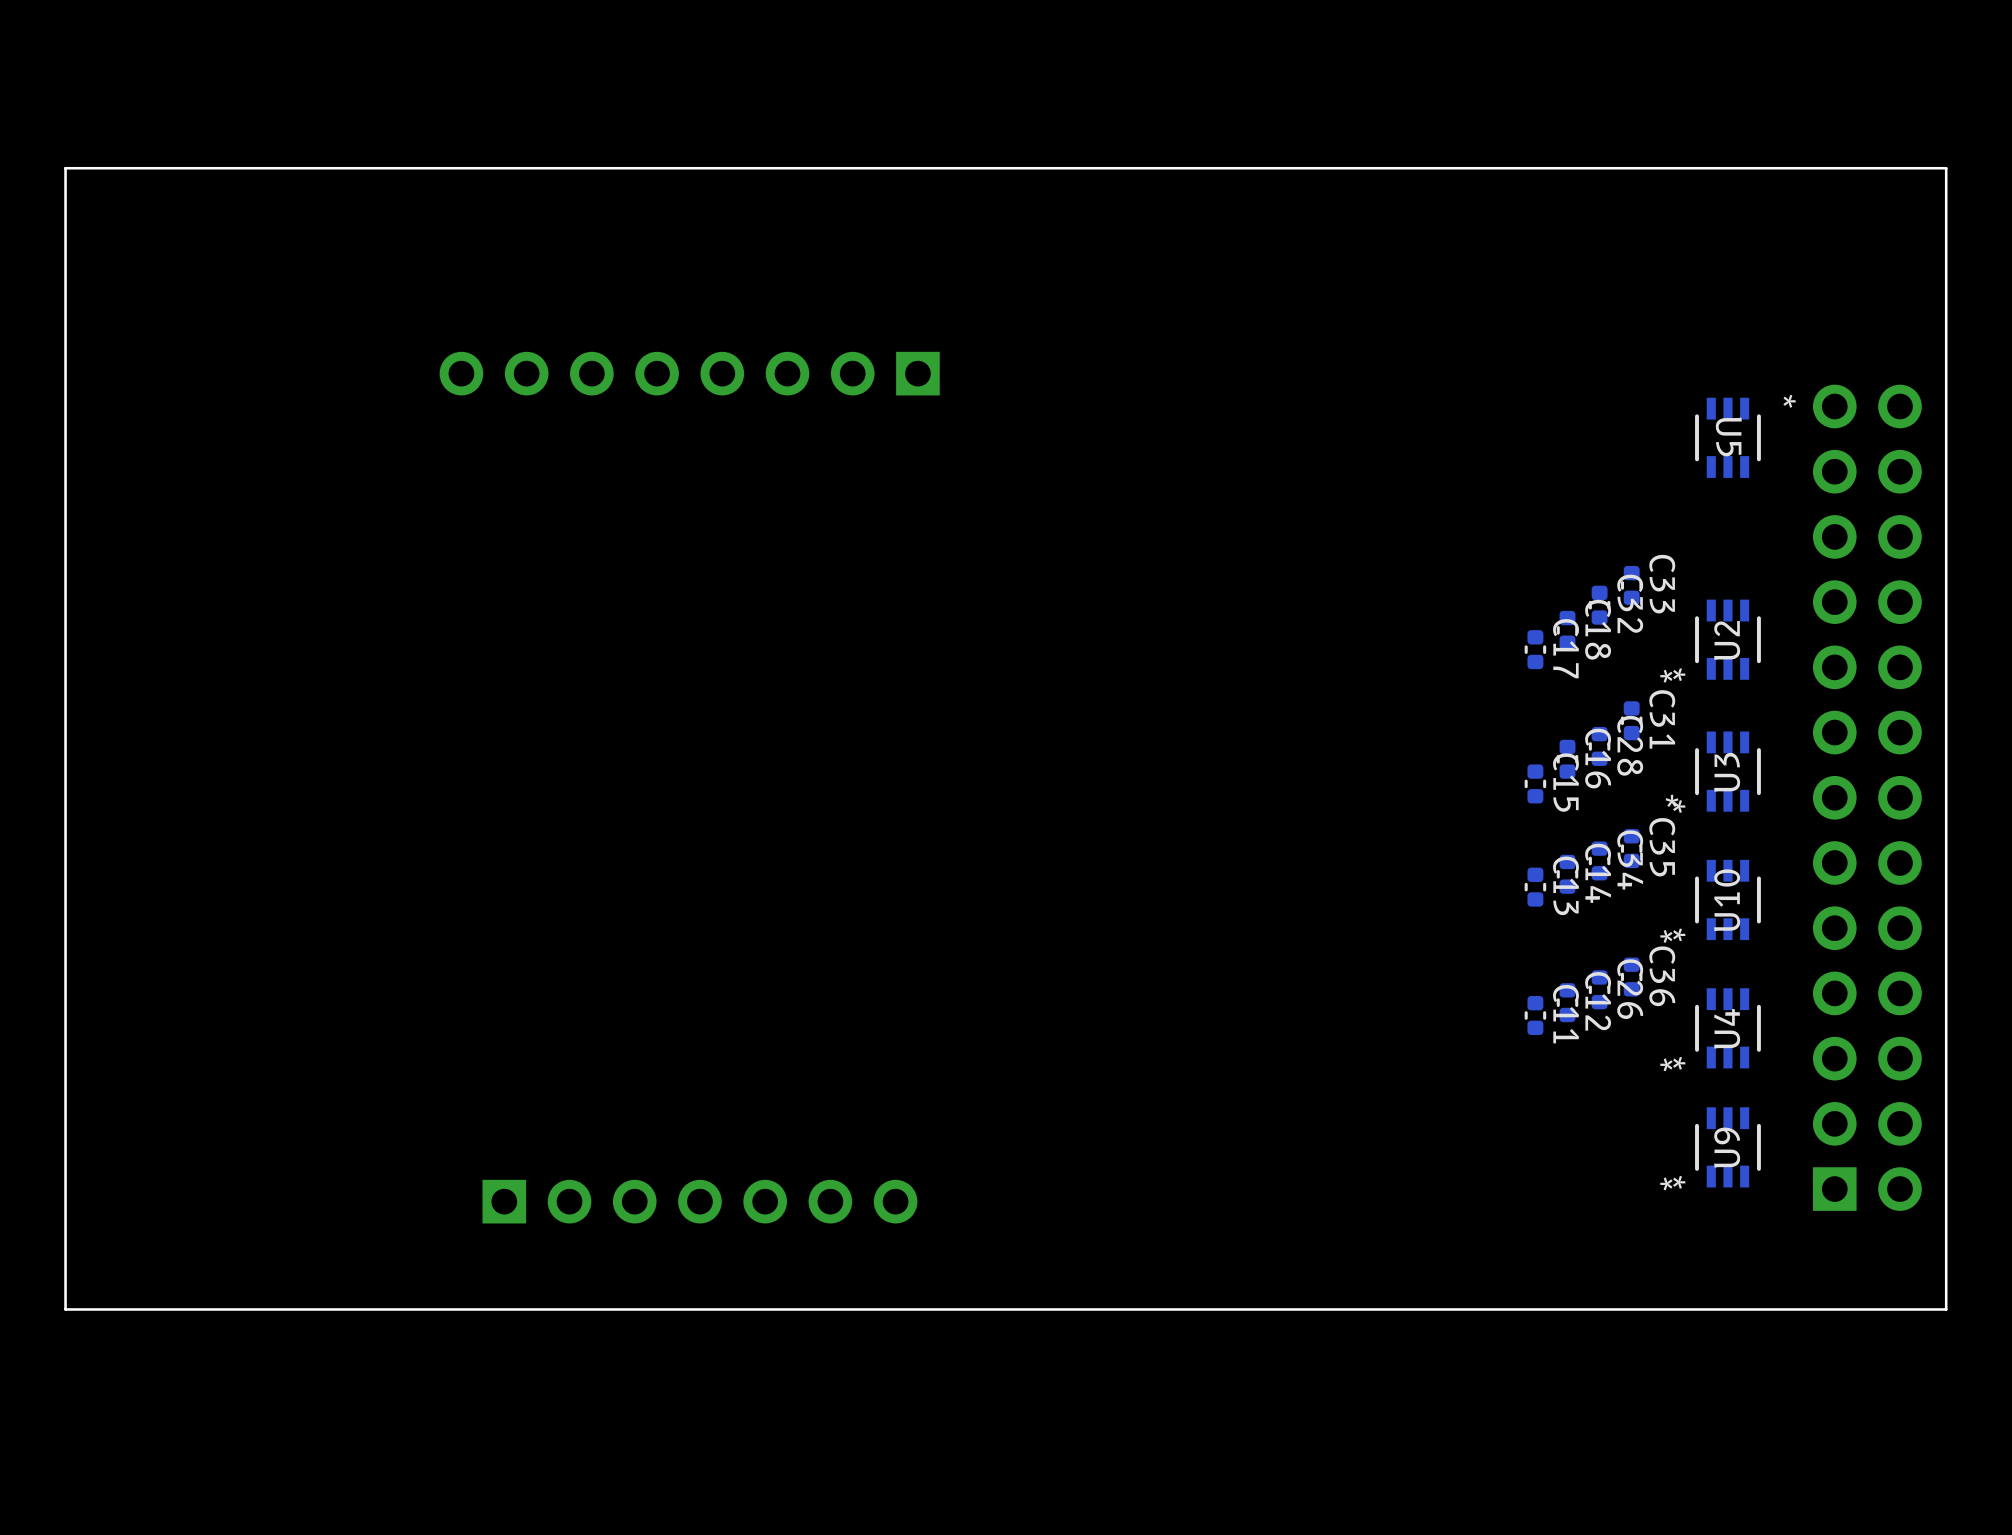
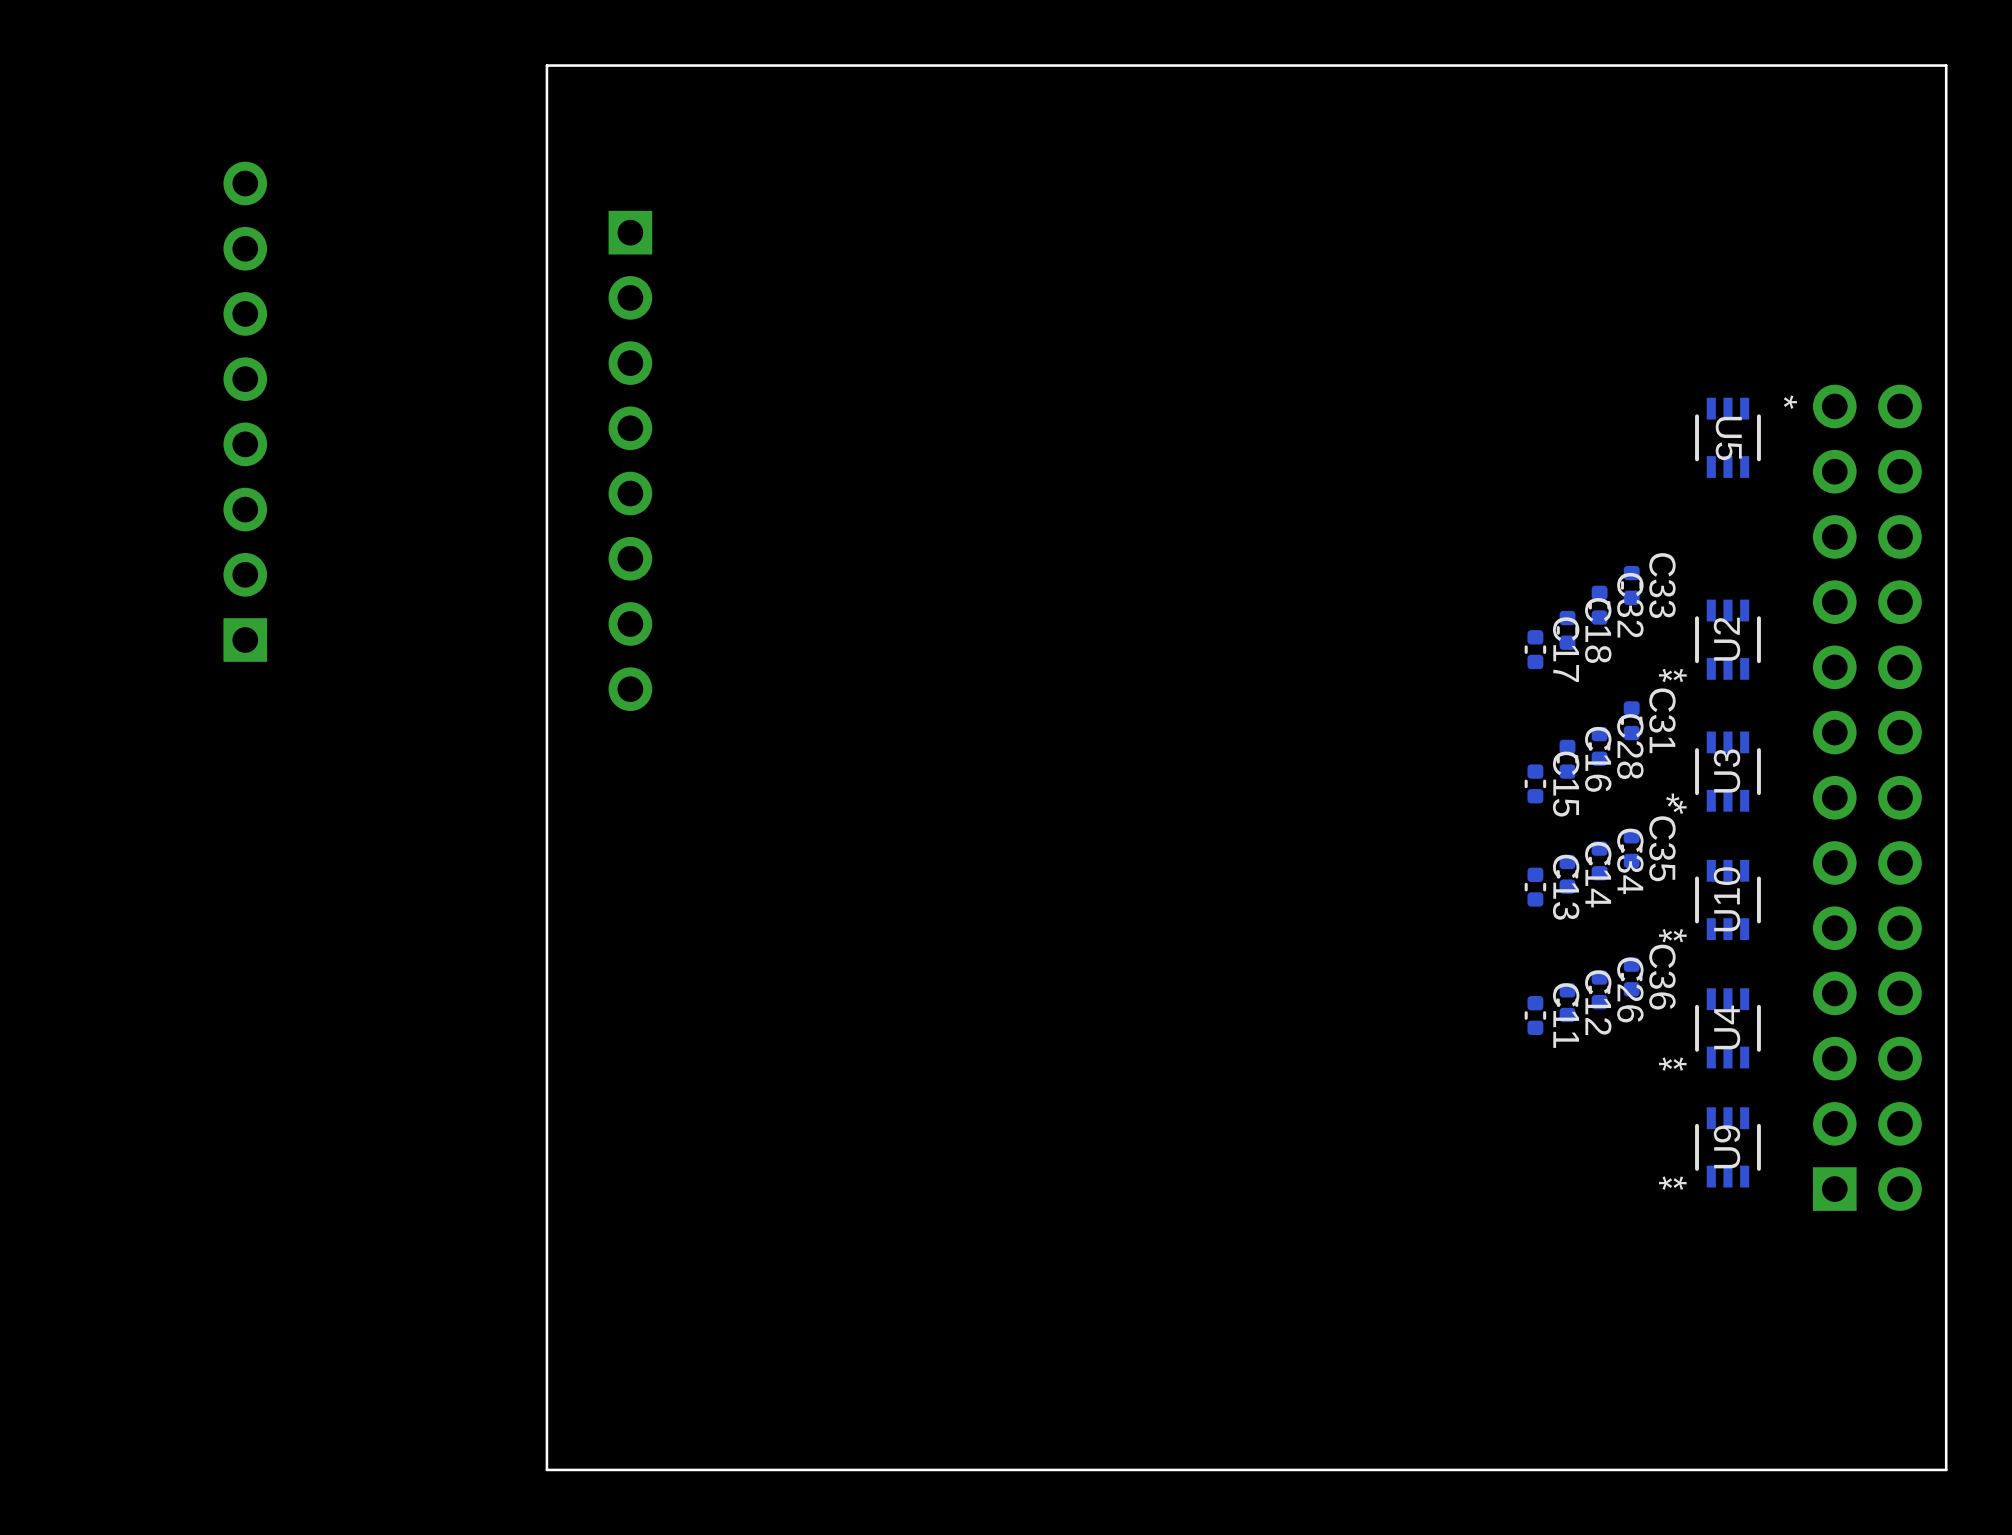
board edge: (1946, 168) (65, 168) (65, 1309) (1946, 1309) -> (1946, 168) (1946, 65) (546, 65) (546, 1469) (1946, 1469) (1946, 1309)
part rotation: 0° (689, 373) -> 90° counterclockwise (630, 460)
part: none -> (245, 411)
part: (699, 1201) -> none

